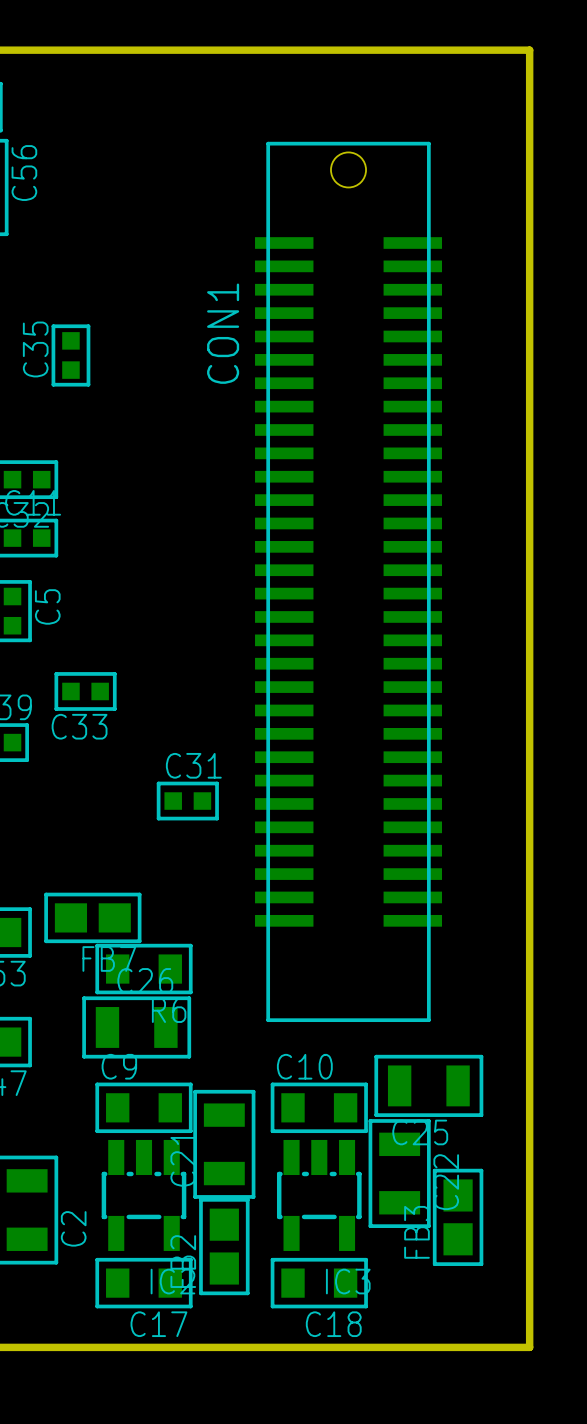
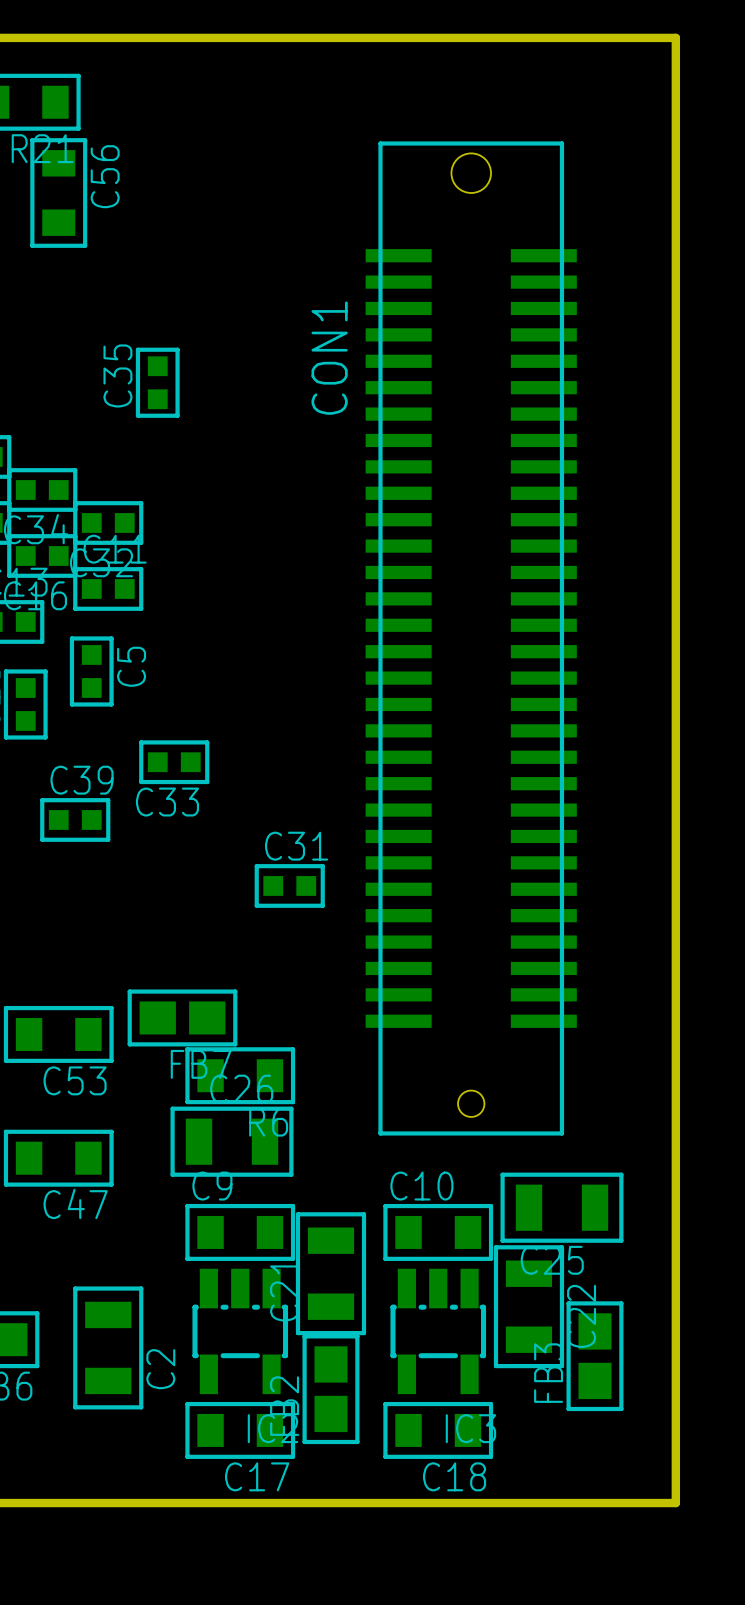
CON1 footprint: [255, 141, 443, 1023] -> [365, 141, 577, 1136]

